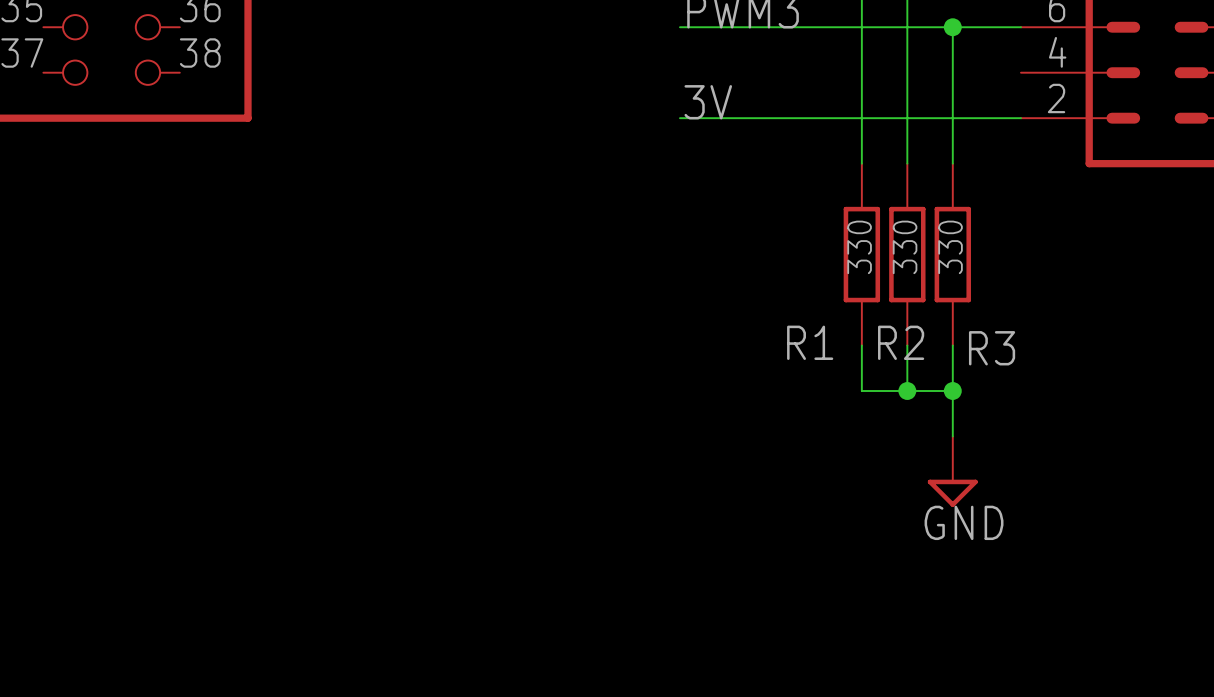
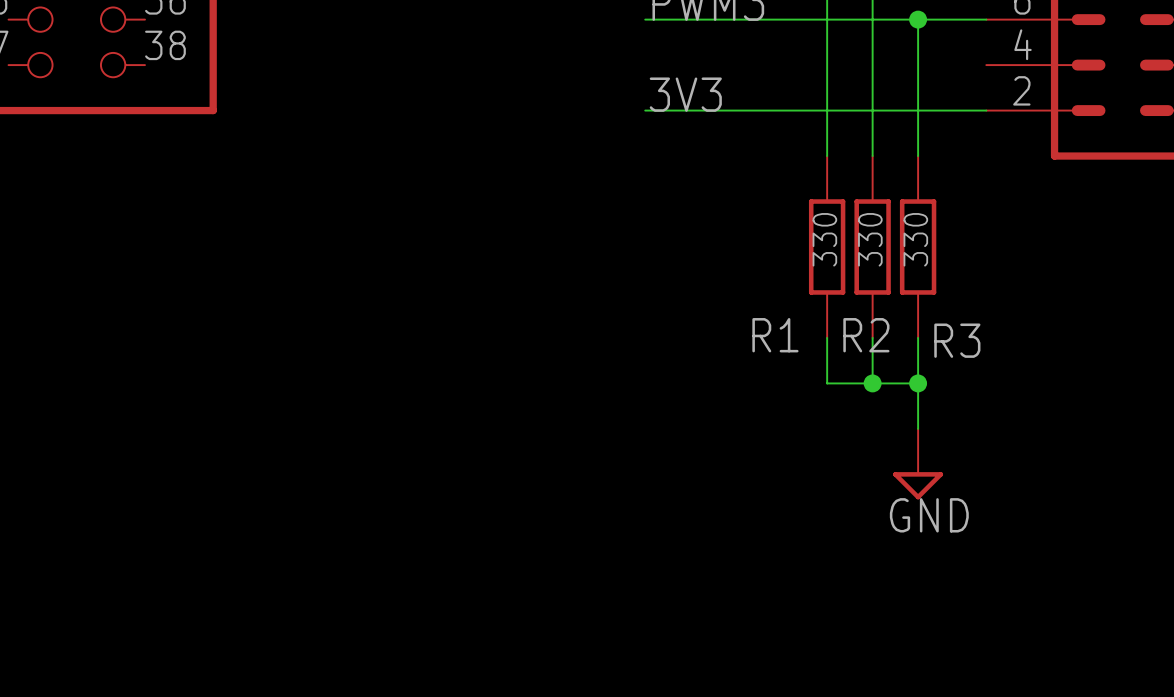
label: 3V (708, 102) -> 3V3 (685, 94)

